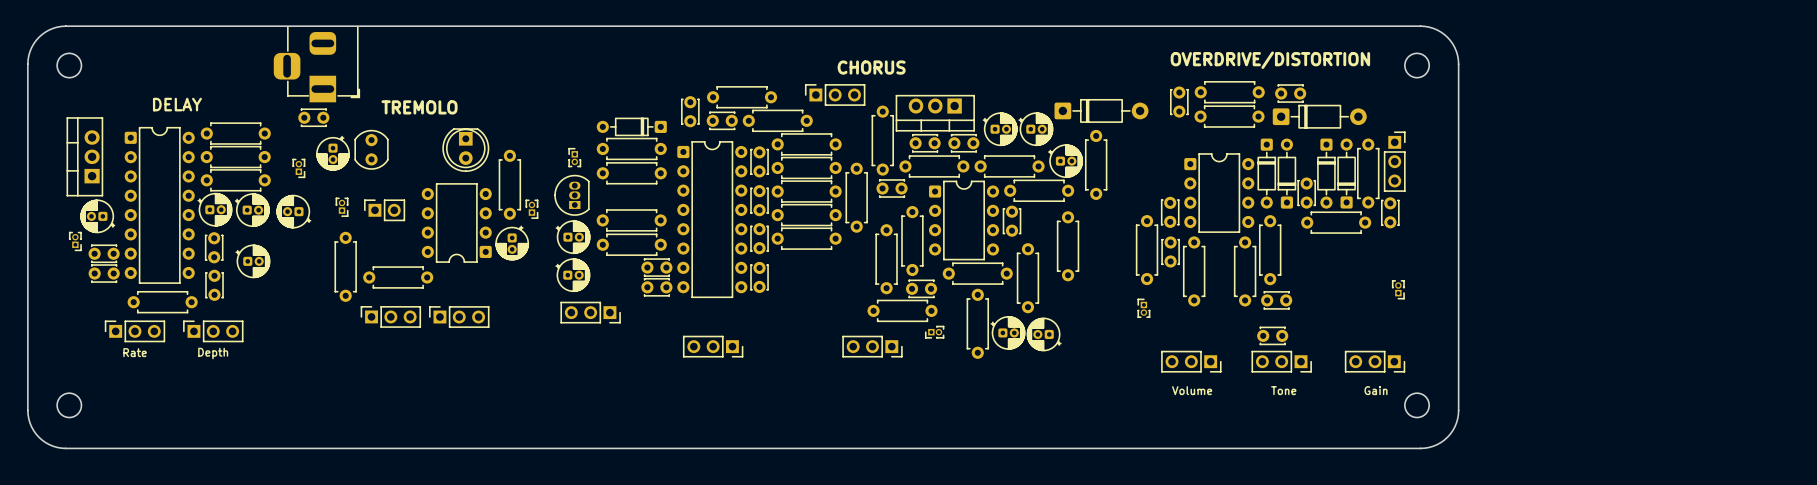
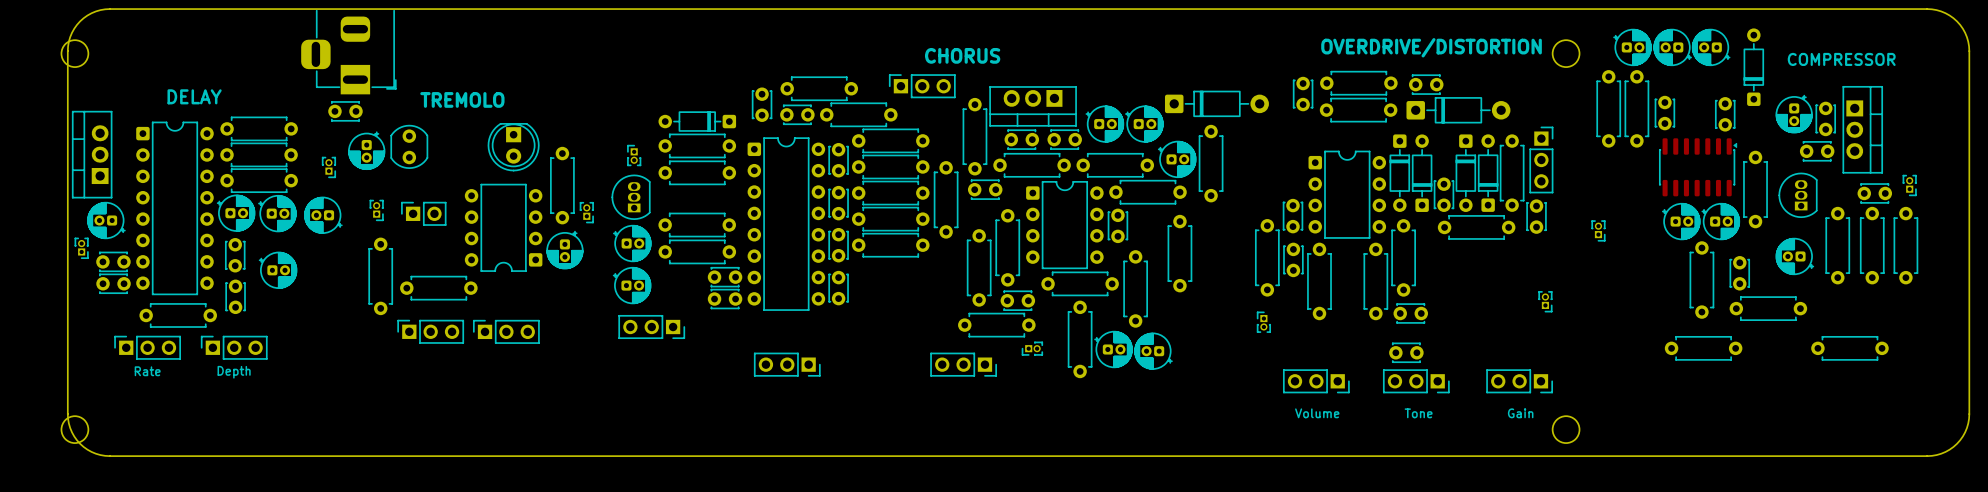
board edge: (65, 26) (1429, 27) (1440, 32) (1450, 40) (1458, 59) (1457, 418) (1452, 430) (1444, 440) (1433, 446) (1420, 448) (57, 447) (38, 437) (31, 426) (28, 414) (27, 64) (29, 51) (38, 37) (49, 29) (65, 26) -> (109, 9) (95, 11) (80, 21) (71, 32) (67, 51) (68, 418) (71, 432) (76, 440) (87, 449) (100, 455) (1927, 456) (1941, 453) (1953, 446) (1962, 436) (1968, 423) (1969, 46) (1965, 32) (1960, 24) (1949, 15) (1936, 10) (109, 9)
part: none -> (1632, 47)
part: none -> (1672, 47)
part: none -> (1711, 47)
text position: OVERDRIVE/DISTORTION (1270, 60) -> OVERDRIVE/DISTORTION (1431, 47)
text: none -> COMPRESSOR (1841, 59)
part: none -> (1753, 67)
part: none -> (1608, 108)
part: none -> (1636, 108)
part: none -> (1664, 113)
part: none -> (1725, 114)
part: none -> (1794, 114)
part: none -> (1825, 118)
part: none -> (1862, 129)
part: none -> (1817, 151)
part: none -> (1698, 167)
part: none -> (1909, 185)
part: none -> (1755, 189)
part: none -> (1874, 193)
part: none -> (1798, 195)
part: none -> (1681, 221)
part: none -> (1720, 221)
part: none -> (1598, 230)
part: none -> (1837, 245)
part: none -> (1872, 245)
part: none -> (1905, 245)
part: none -> (1794, 256)
part: none -> (1739, 273)
part: none -> (1701, 280)
part: none -> (1768, 308)
part: none -> (1703, 348)
part: none -> (1849, 348)

